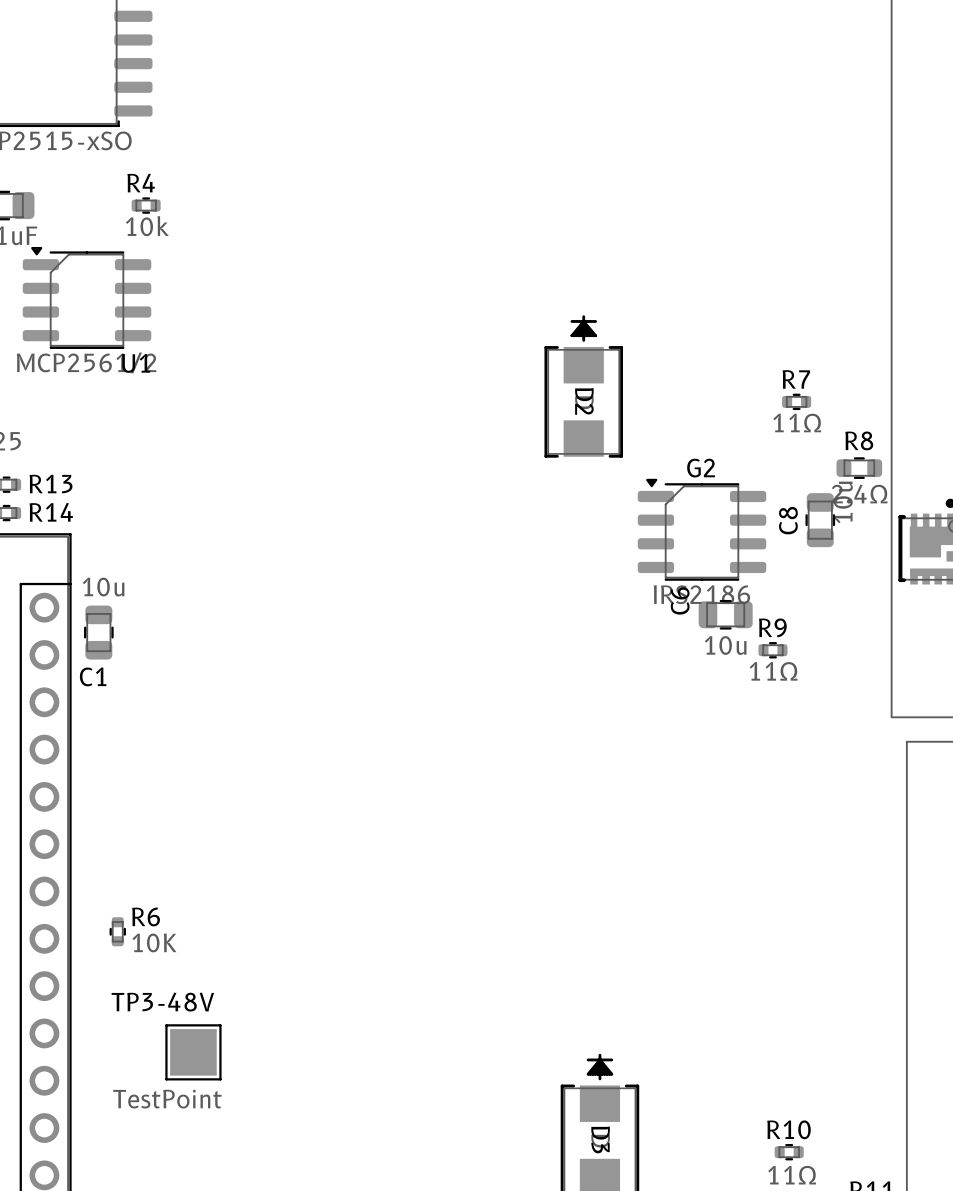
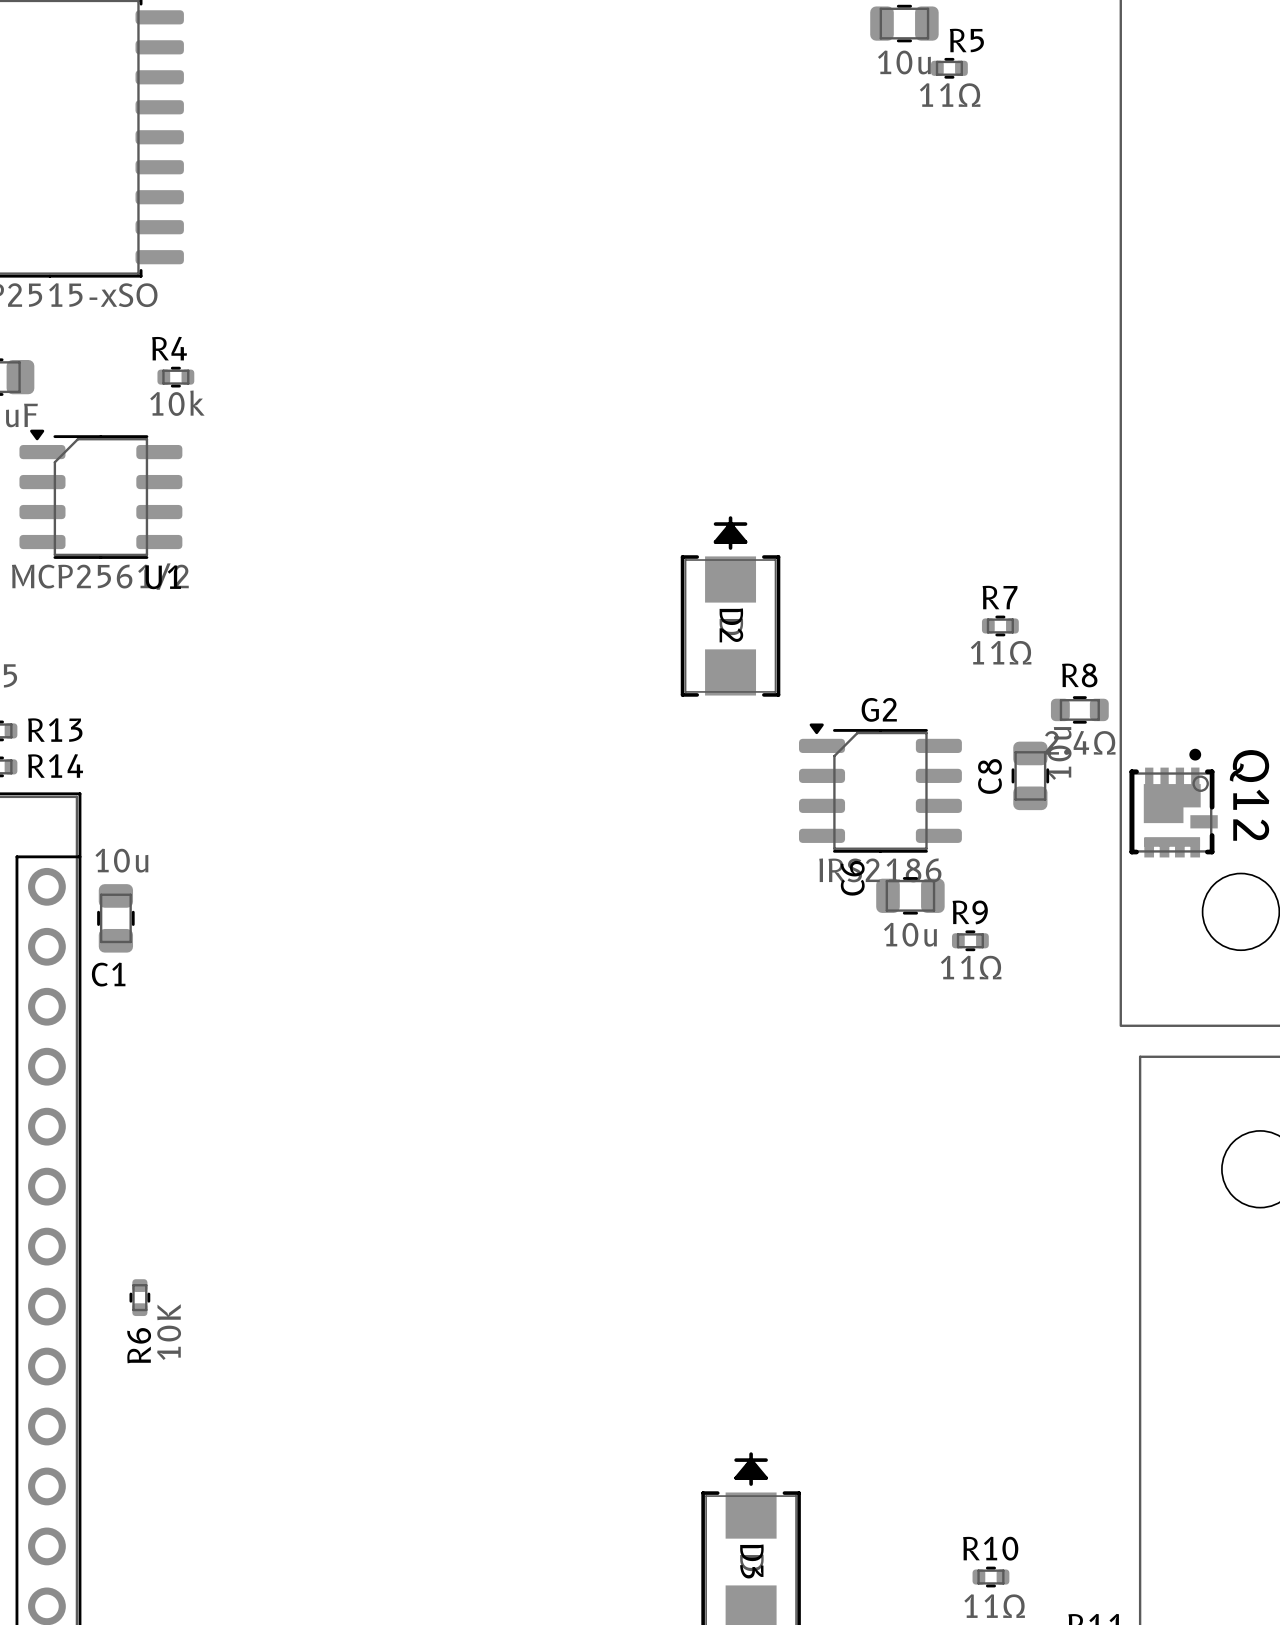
R6 name rotation: 0° (146, 916) -> 90° counterclockwise (139, 1345)
R6 name position: R6 (146, 916) -> R6 (139, 1345)
R6 value rotation: 0° (154, 942) -> 90° counterclockwise (169, 1332)
TP3-48V: TestPoint (193, 1052) -> none

